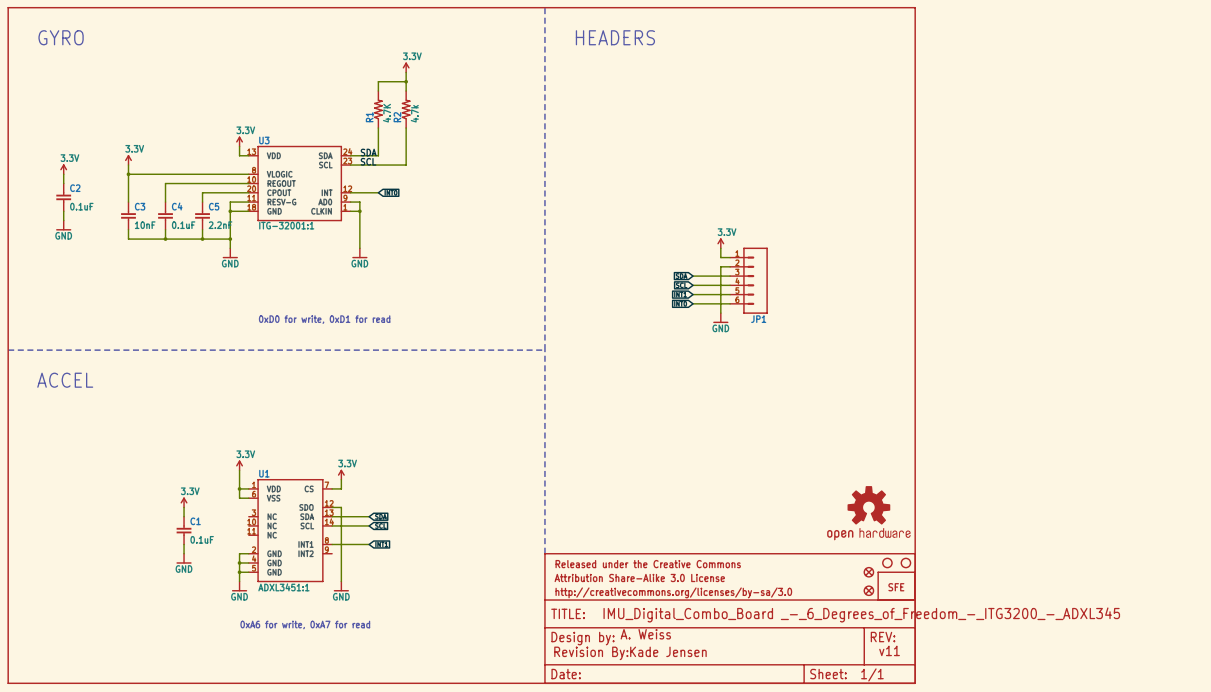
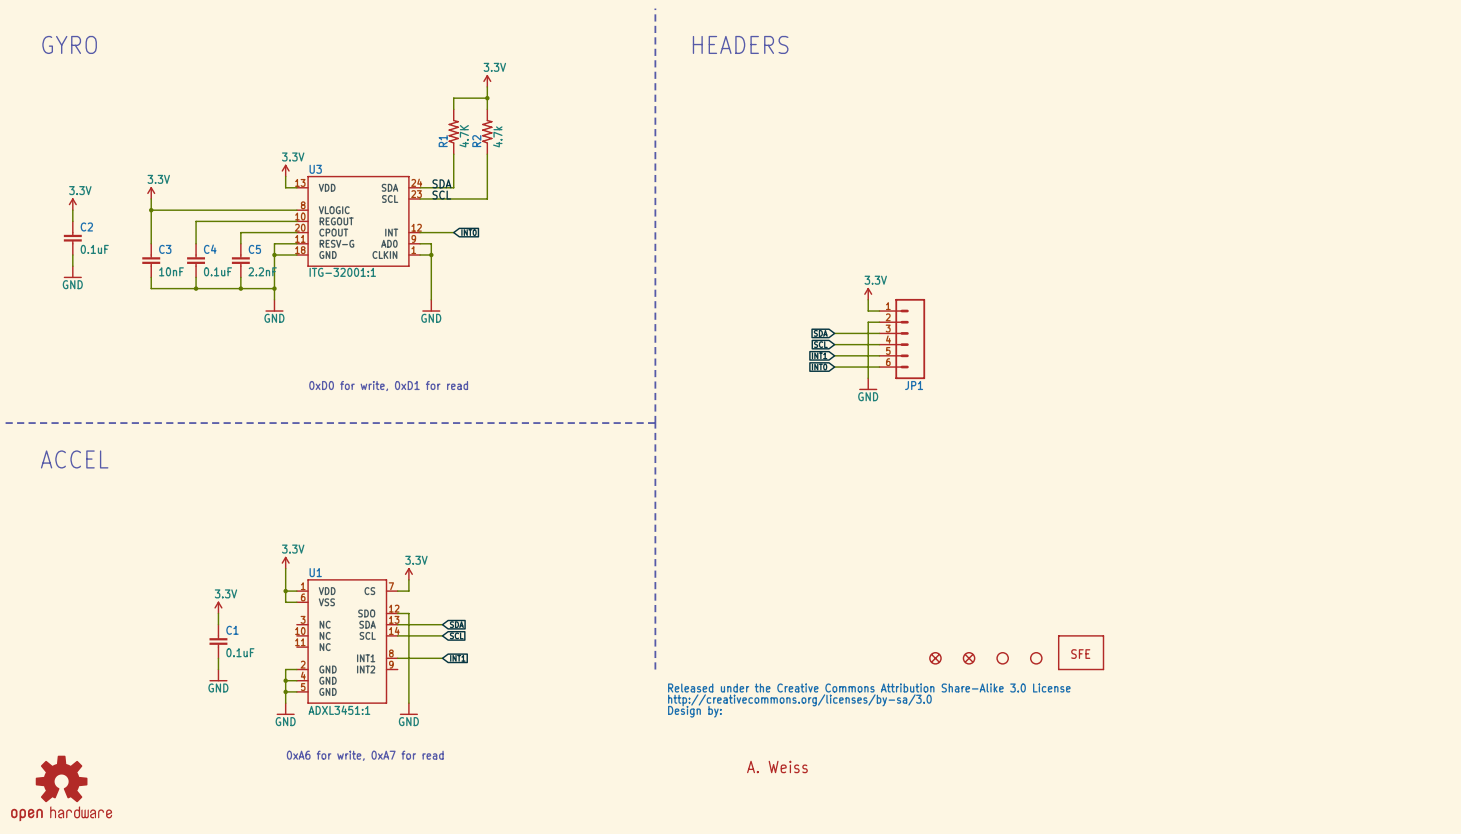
part: (461, 345) -> none
part: (868, 513) -> none
part: none -> (935, 658)
part: none -> (969, 658)
part: none -> (1002, 658)
part: none -> (1036, 658)
part: (887, 562) -> none
part: (905, 562) -> none
part: (868, 572) -> none
part: none -> (869, 700)
part position: (896, 586) -> (1081, 652)
part: (868, 590) -> none
part: (730, 618) -> none
text: v11 (889, 650) -> none
text: Kade Jensen (668, 651) -> none
part: none -> (61, 788)
part: (591, 653) -> none

